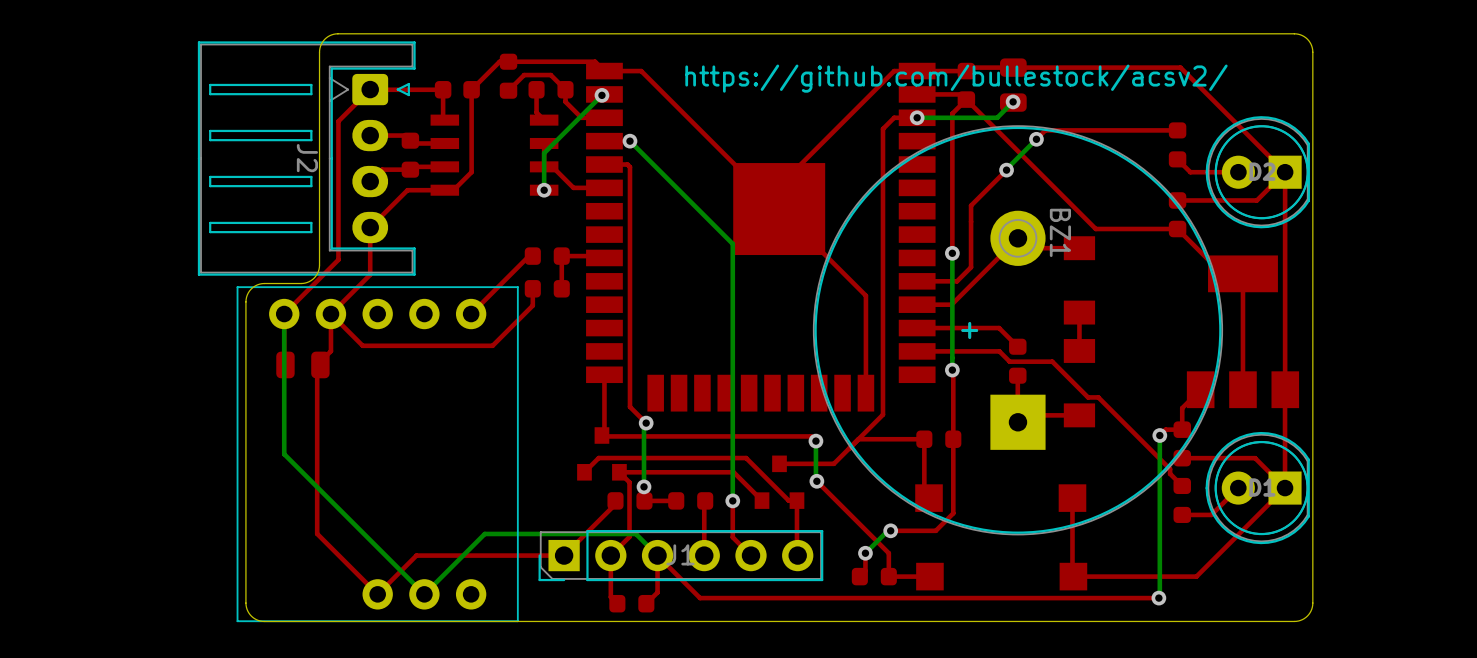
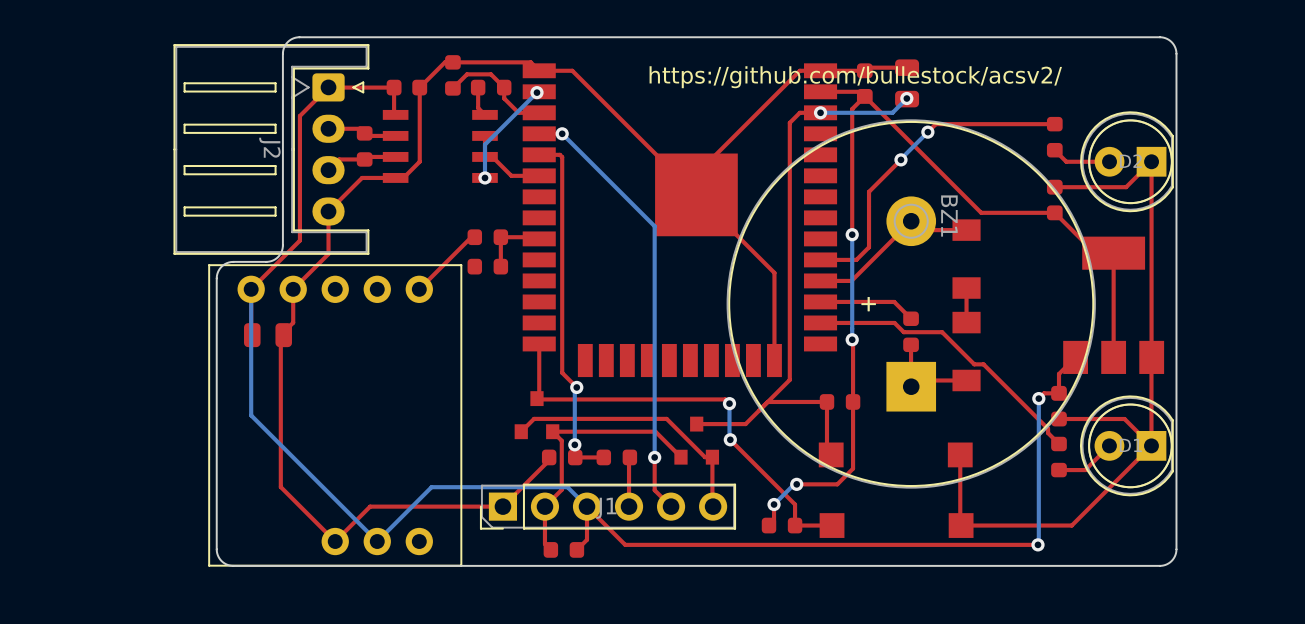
top track: (1013, 67) (1180, 67) (1285, 172) -> none
top track: (532, 288) (532, 305) (492, 345) (362, 345) (330, 314) -> none

